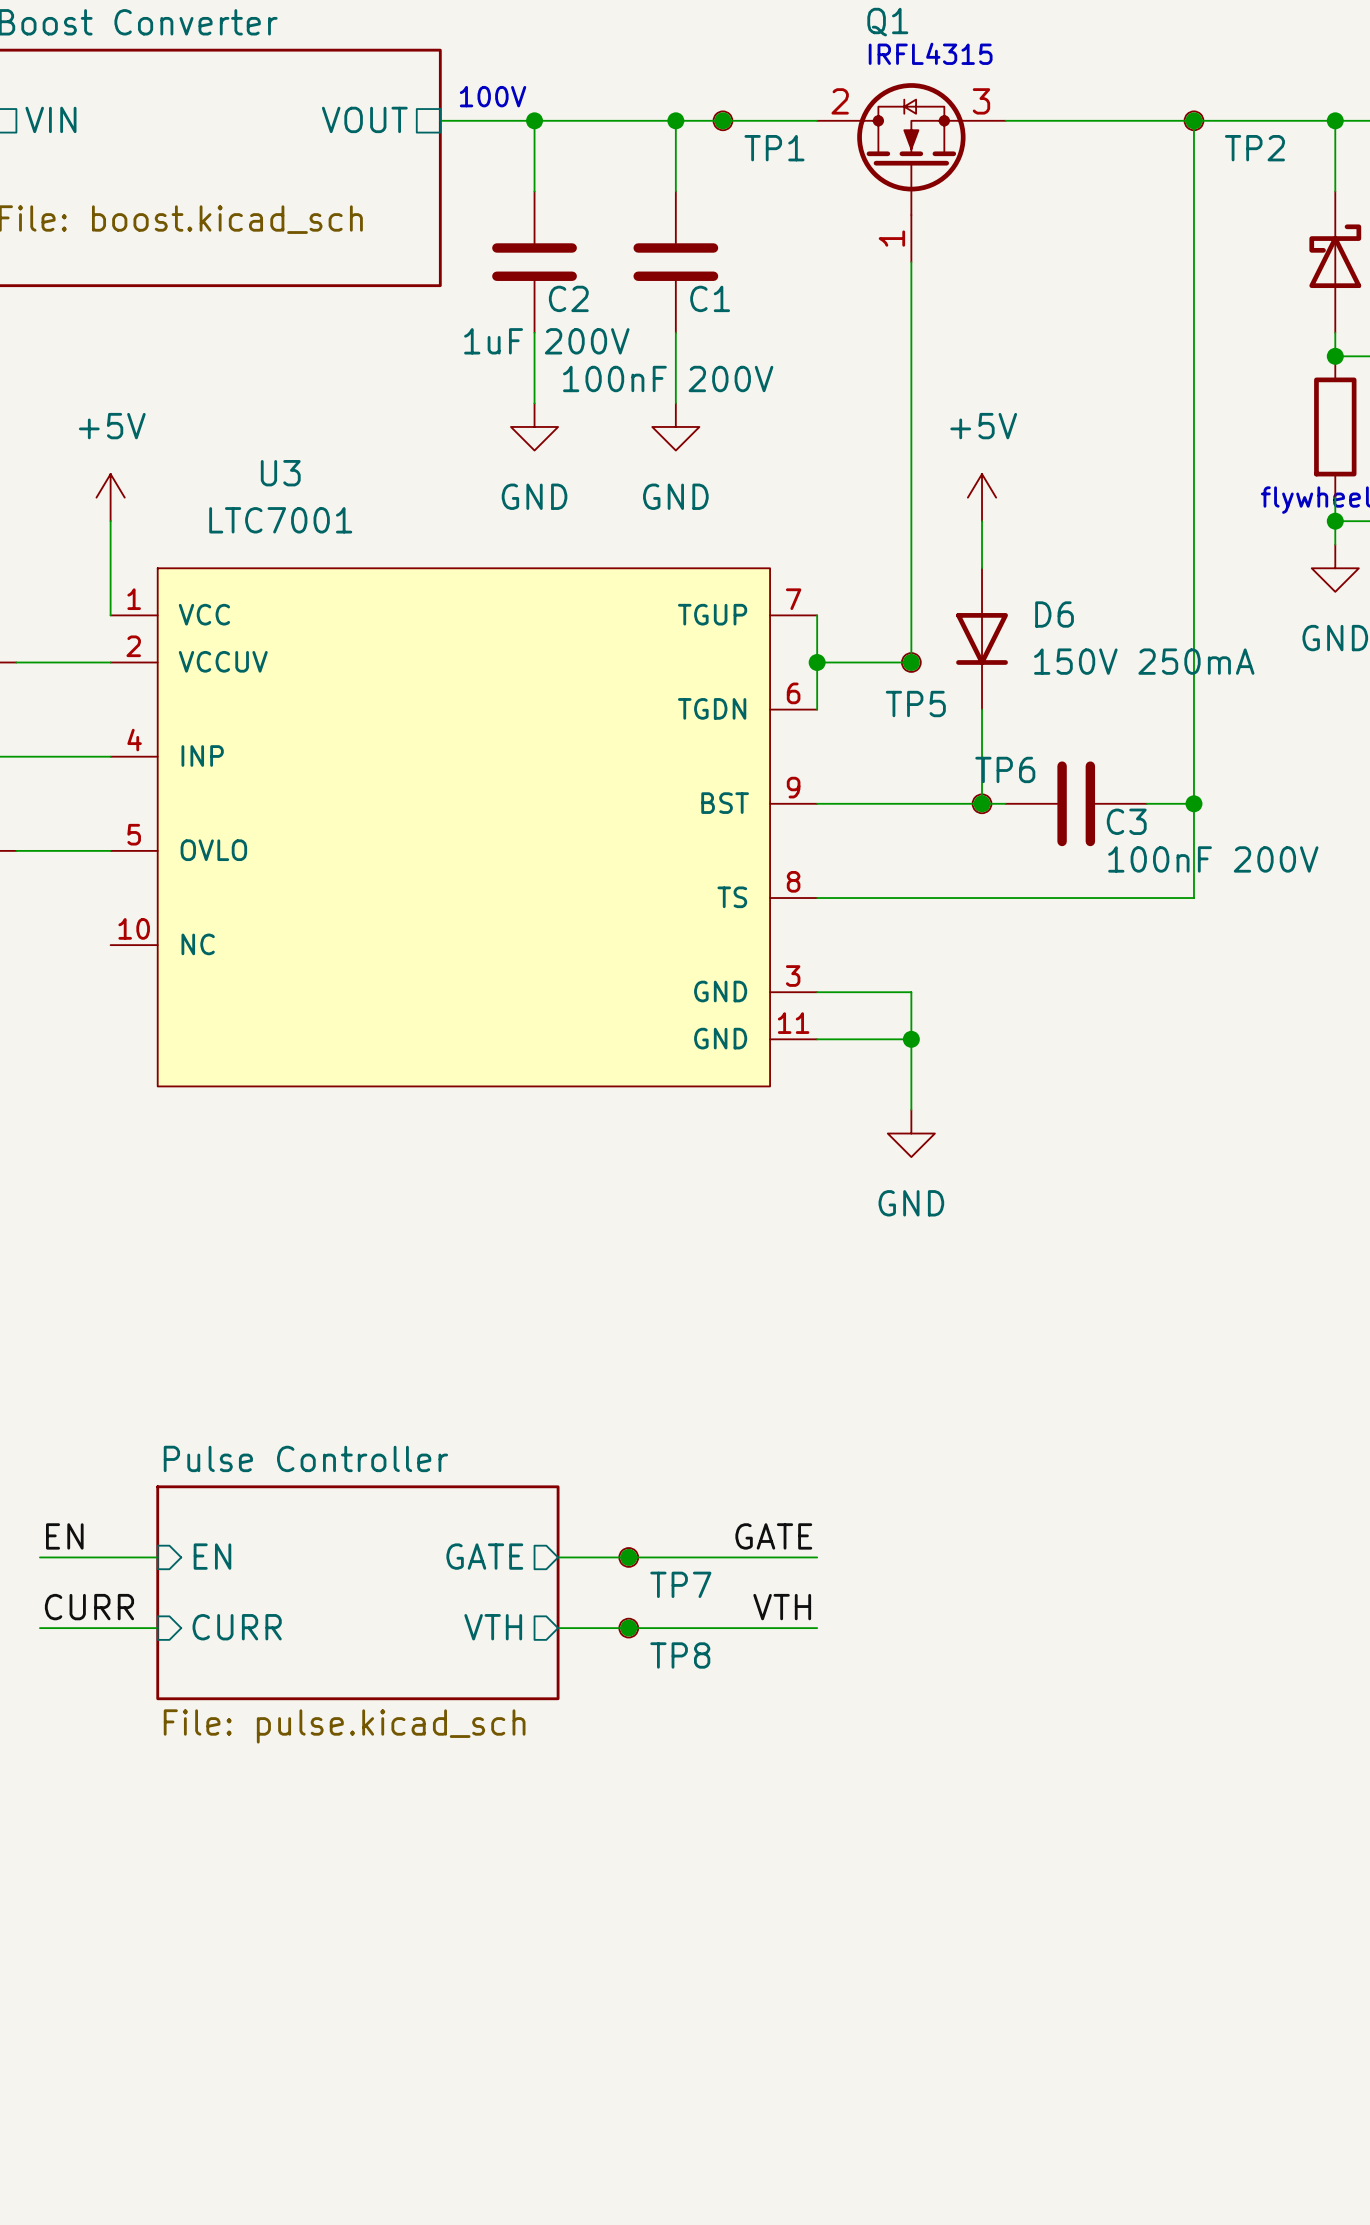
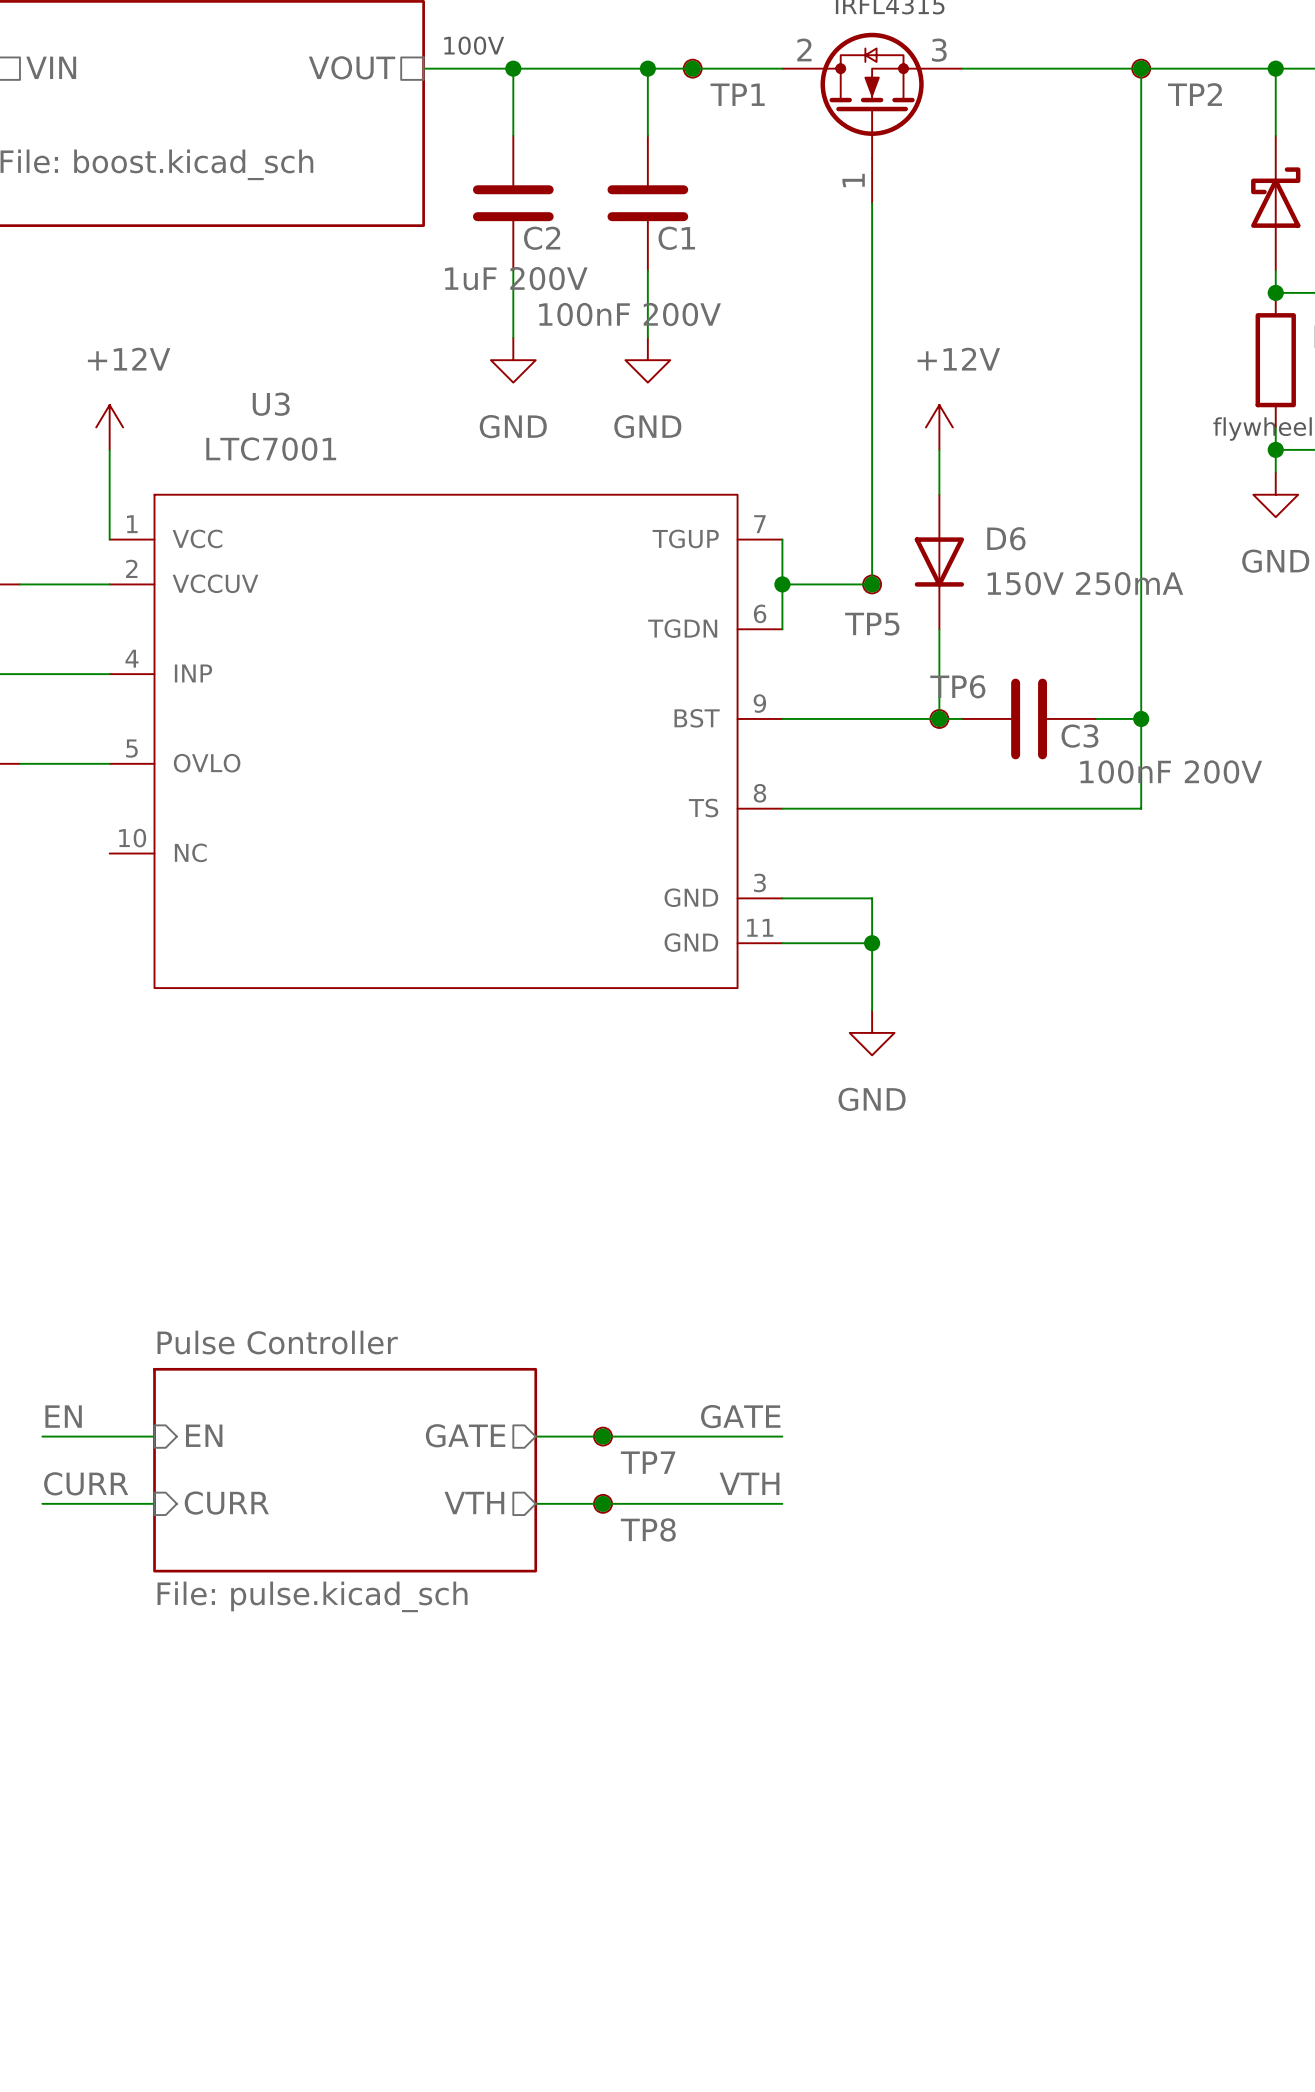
power symbol: +5V (110, 497) -> +12V (109, 427)
power symbol: +5V (982, 497) -> +12V (939, 427)

